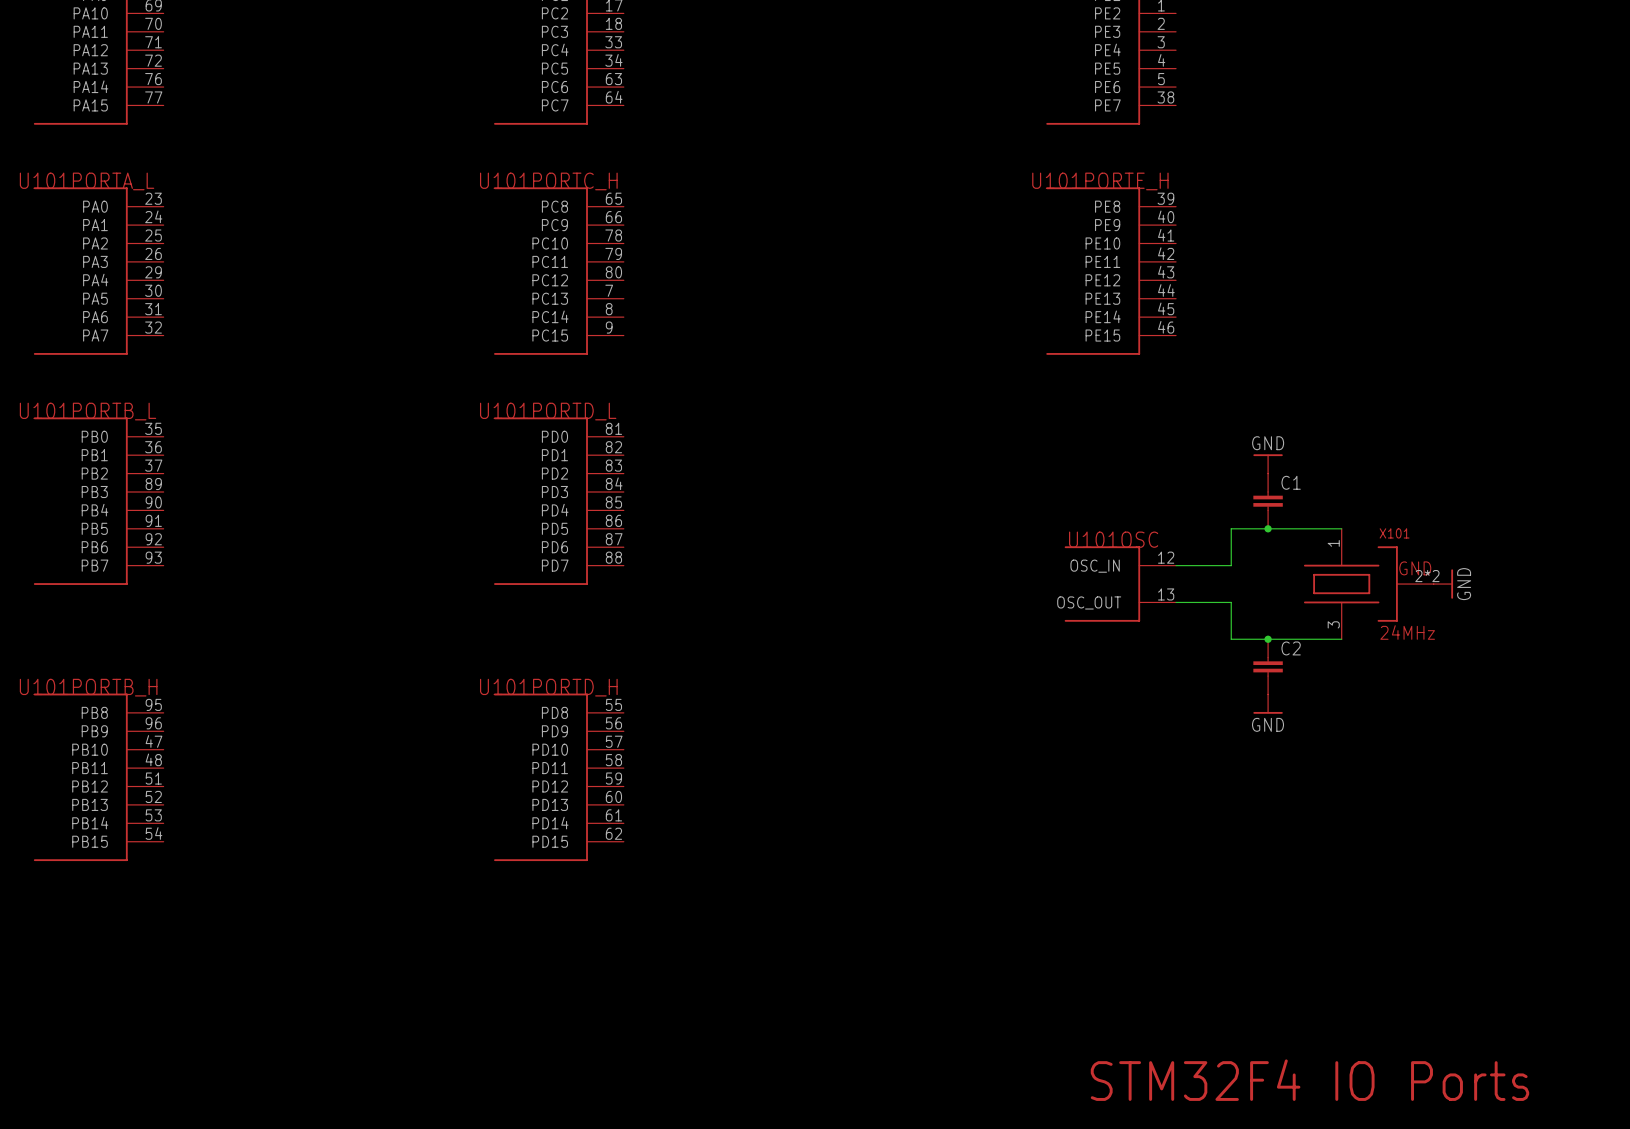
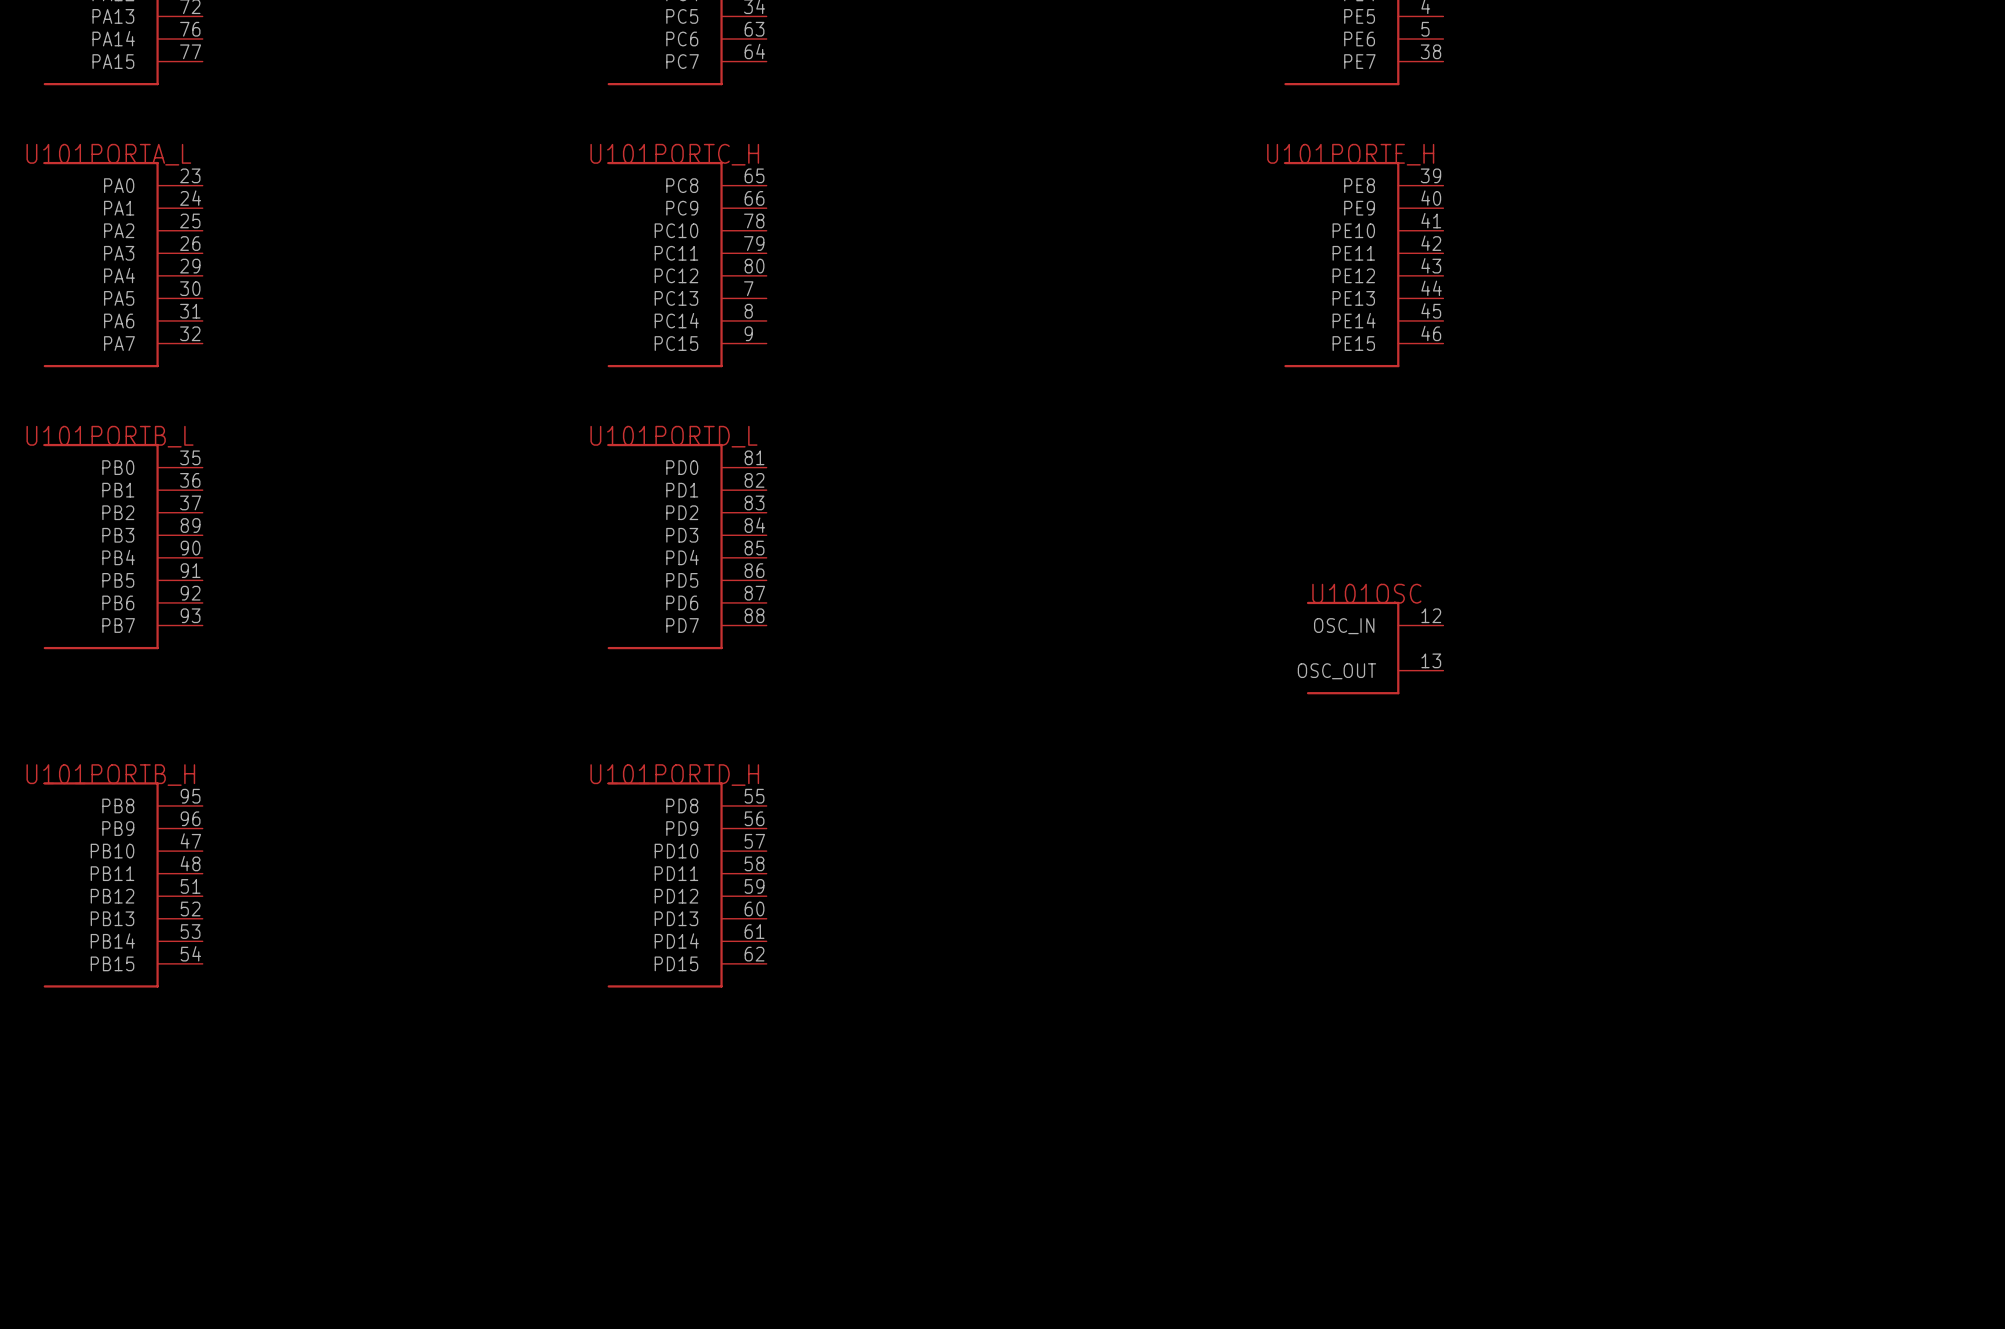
power symbol: GND (1268, 463) -> none
C1: (1268, 501) -> none
junction: (1268, 528) -> none
wire: (1341, 528) (1231, 528) (1231, 565) (1176, 565) -> none
X101: 24MHz (1368, 584) -> none
power symbol: GND (1443, 584) -> none
wire: (1176, 602) (1231, 602) (1231, 639) (1341, 639) -> none
junction: (1268, 639) -> none
C2: (1268, 666) -> none
power symbol: GND (1268, 704) -> none
text: STM32F4 IO Ports (1309, 1080) -> none

